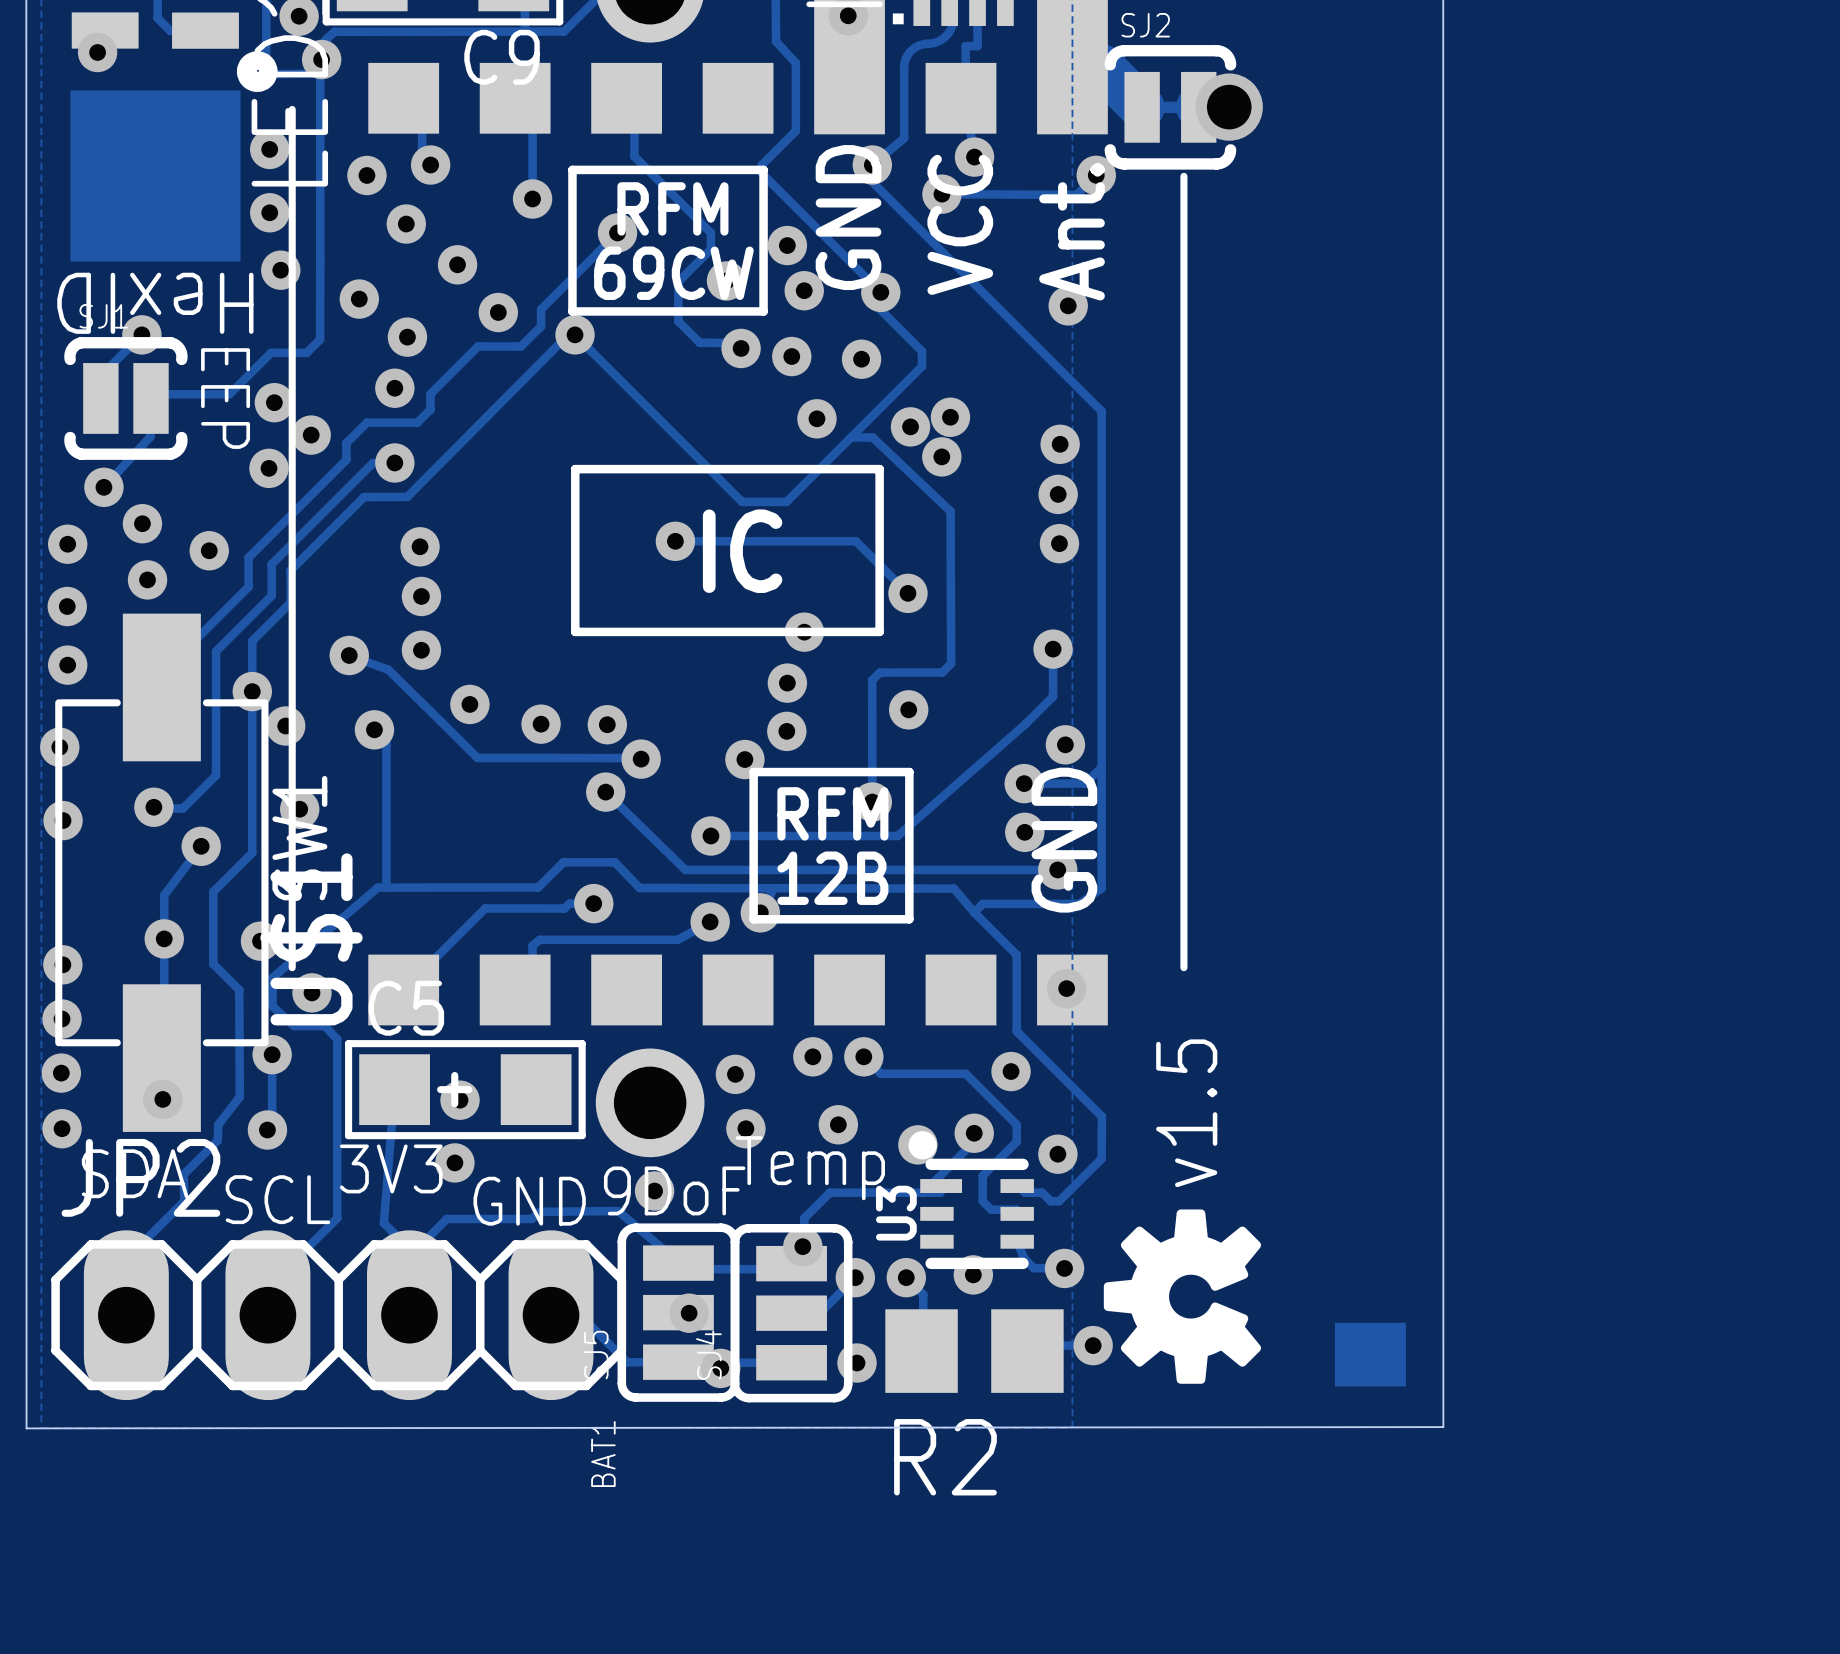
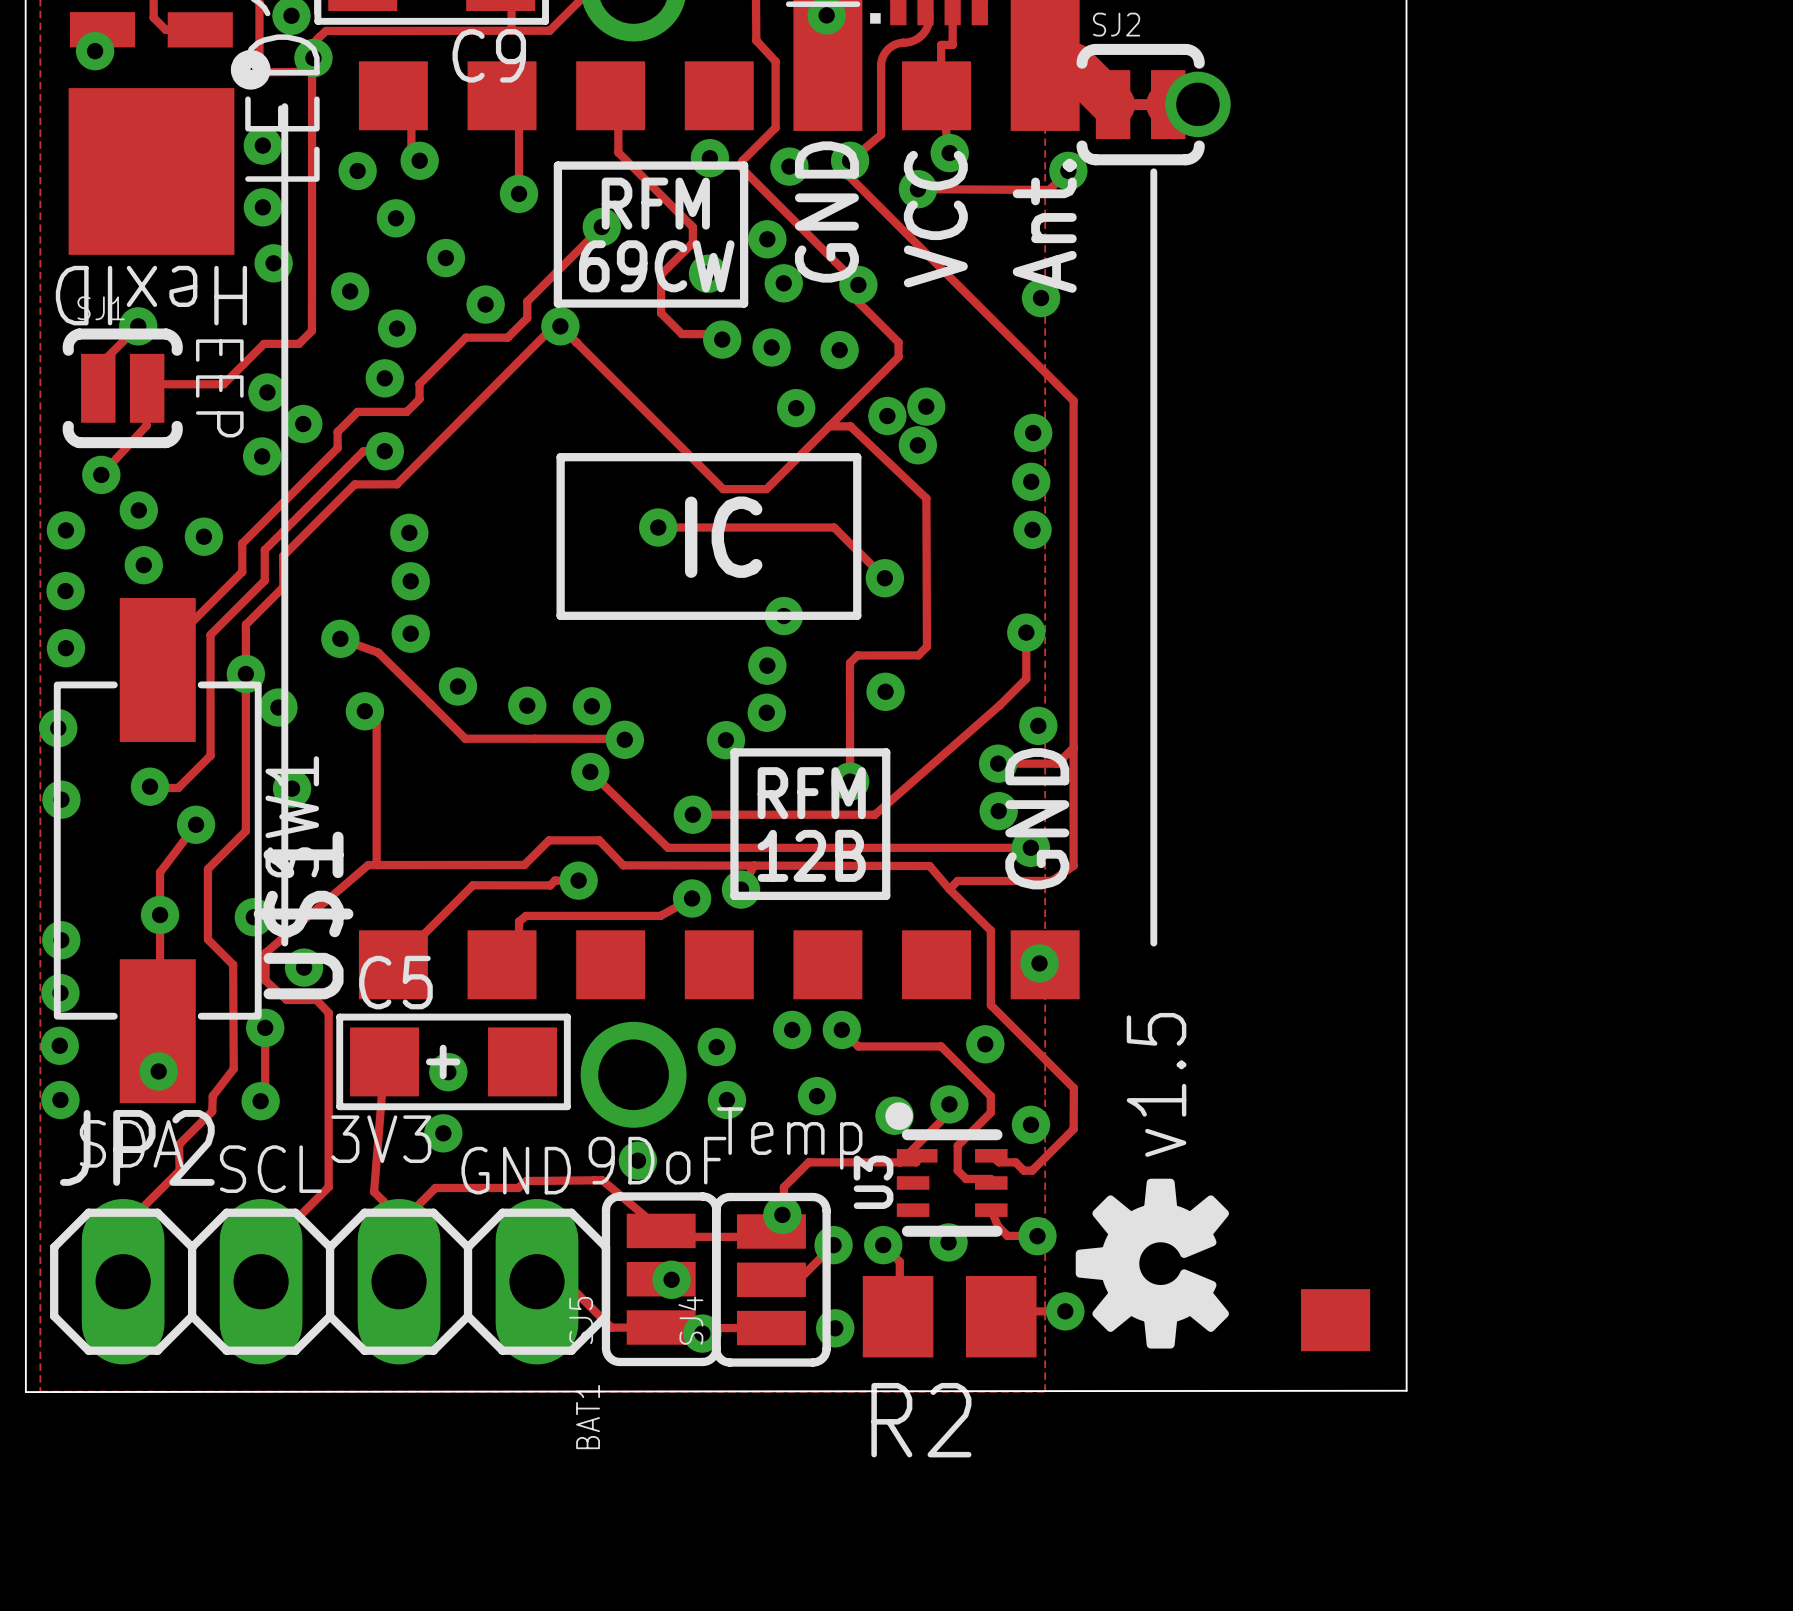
via: none -> (709, 158)
via: none -> (789, 166)

